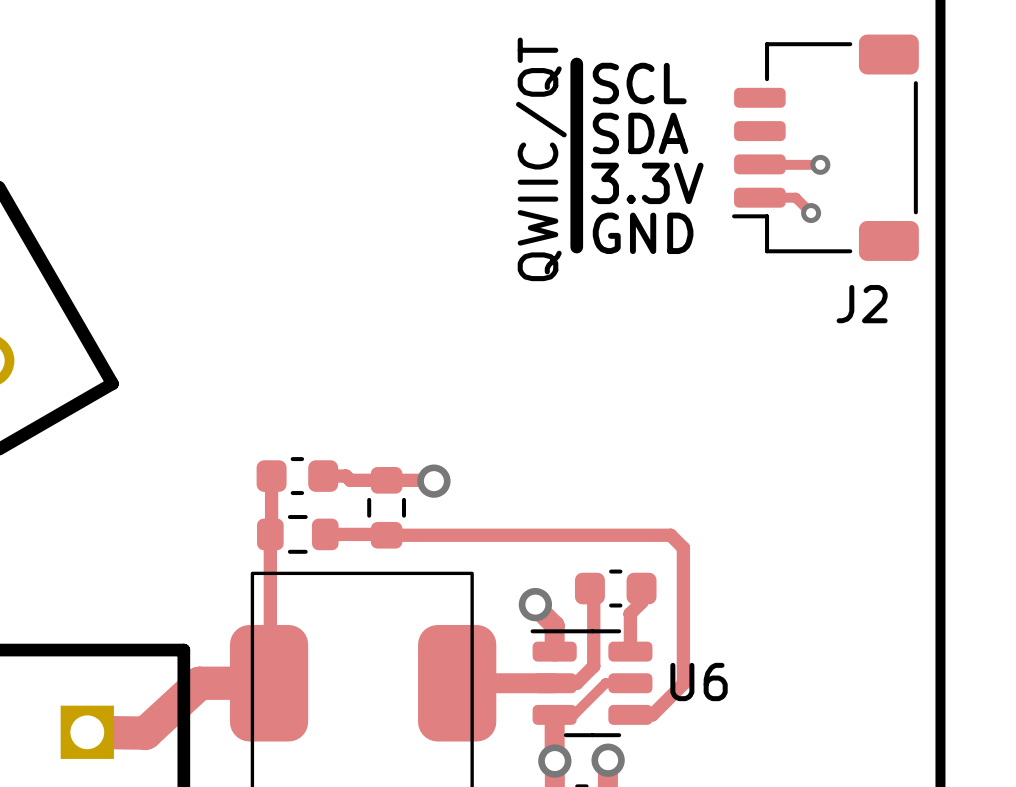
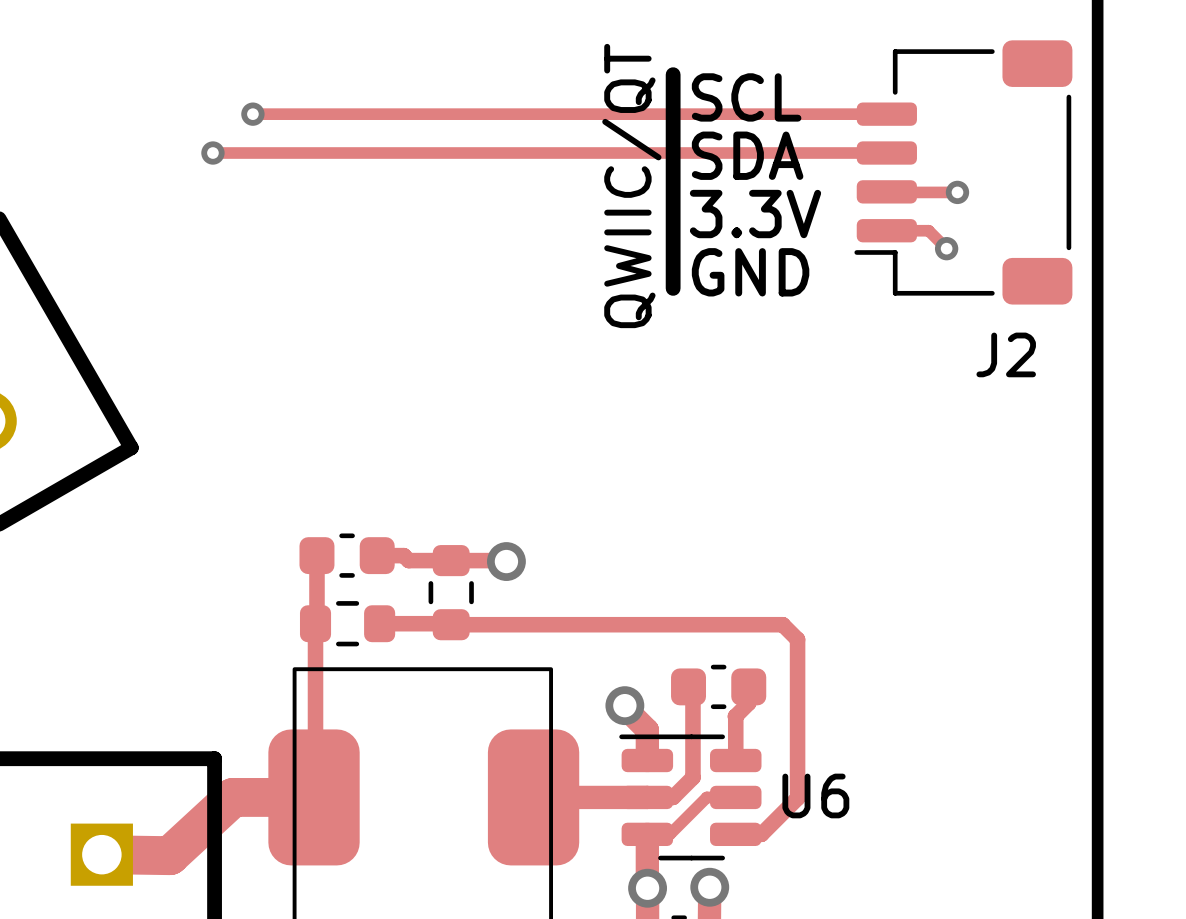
track: none -> (252, 114) (886, 114)
via: none -> (252, 114)
track: none -> (212, 153) (886, 153)
via: none -> (212, 153)

